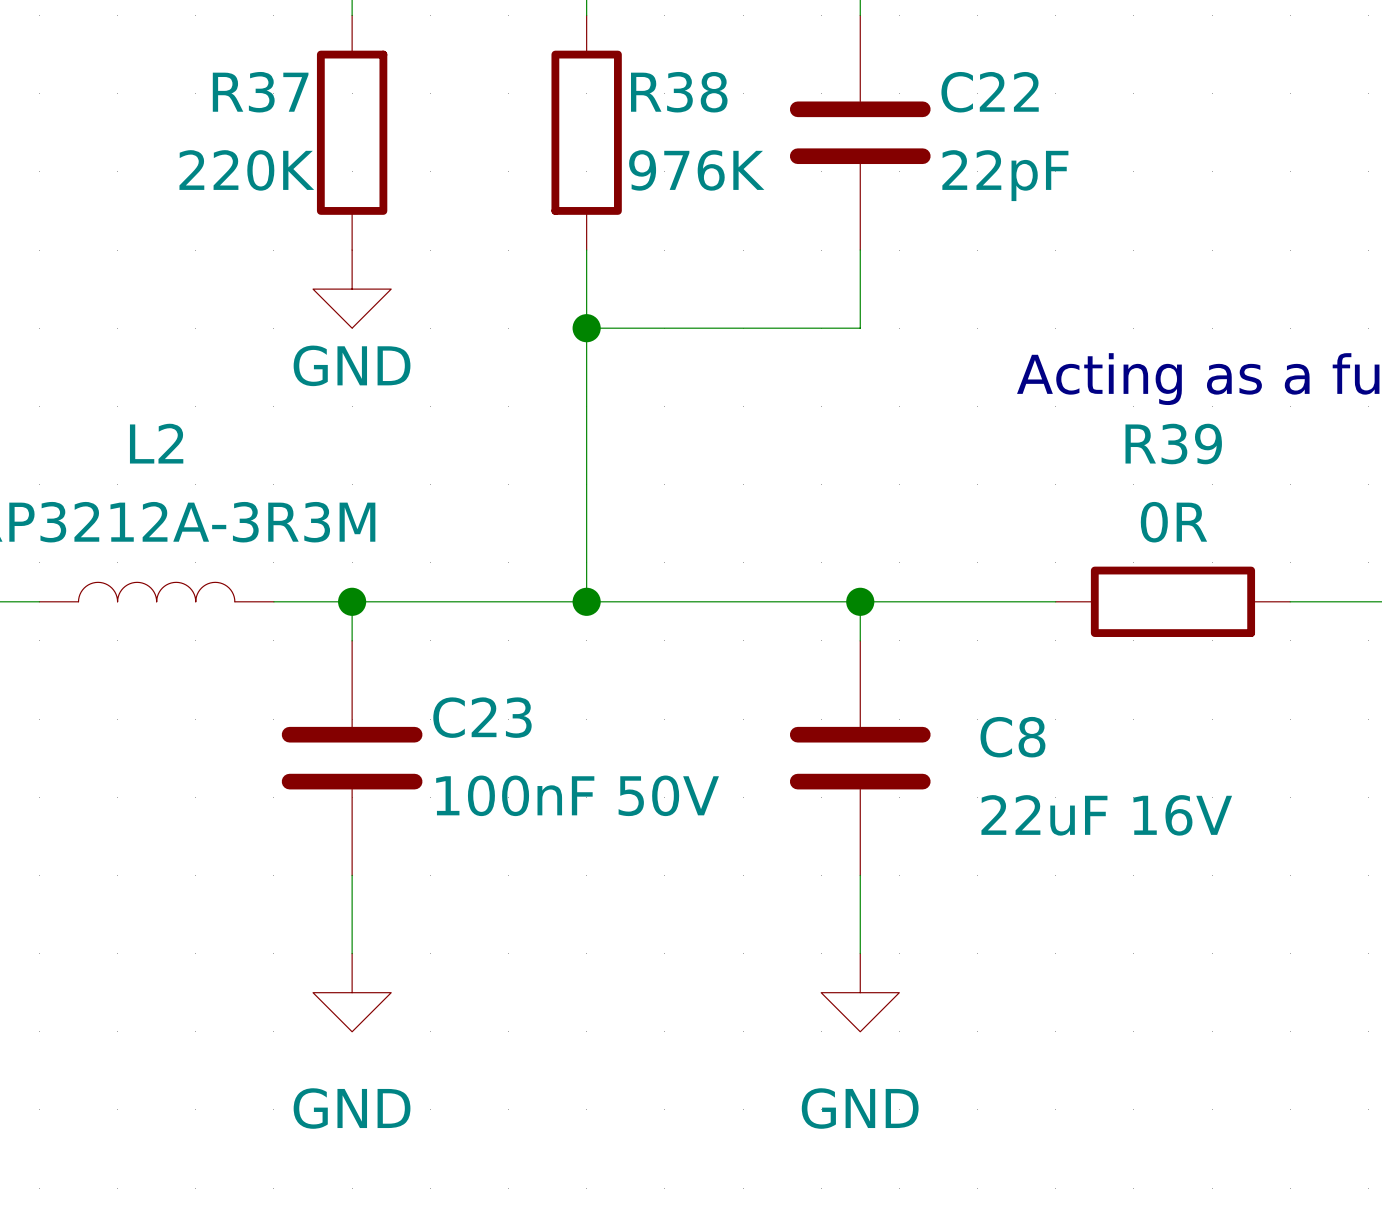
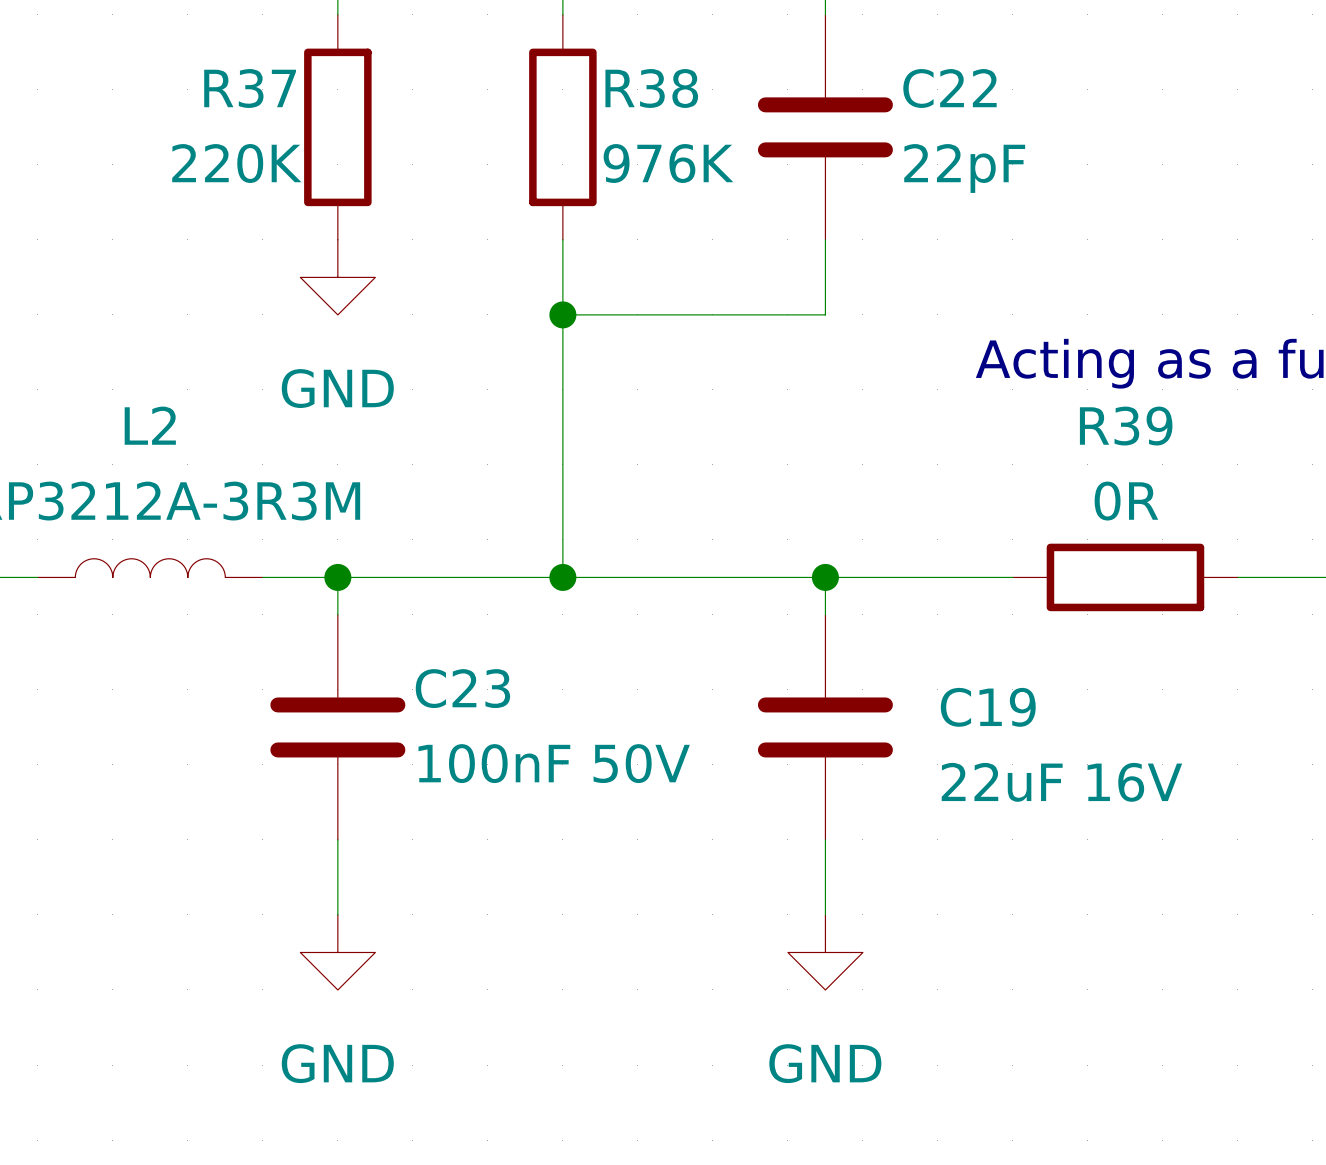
power symbol text position: GND (352, 365) -> GND (337, 388)
C8 name: C8 (1012, 737) -> C19 (988, 707)

